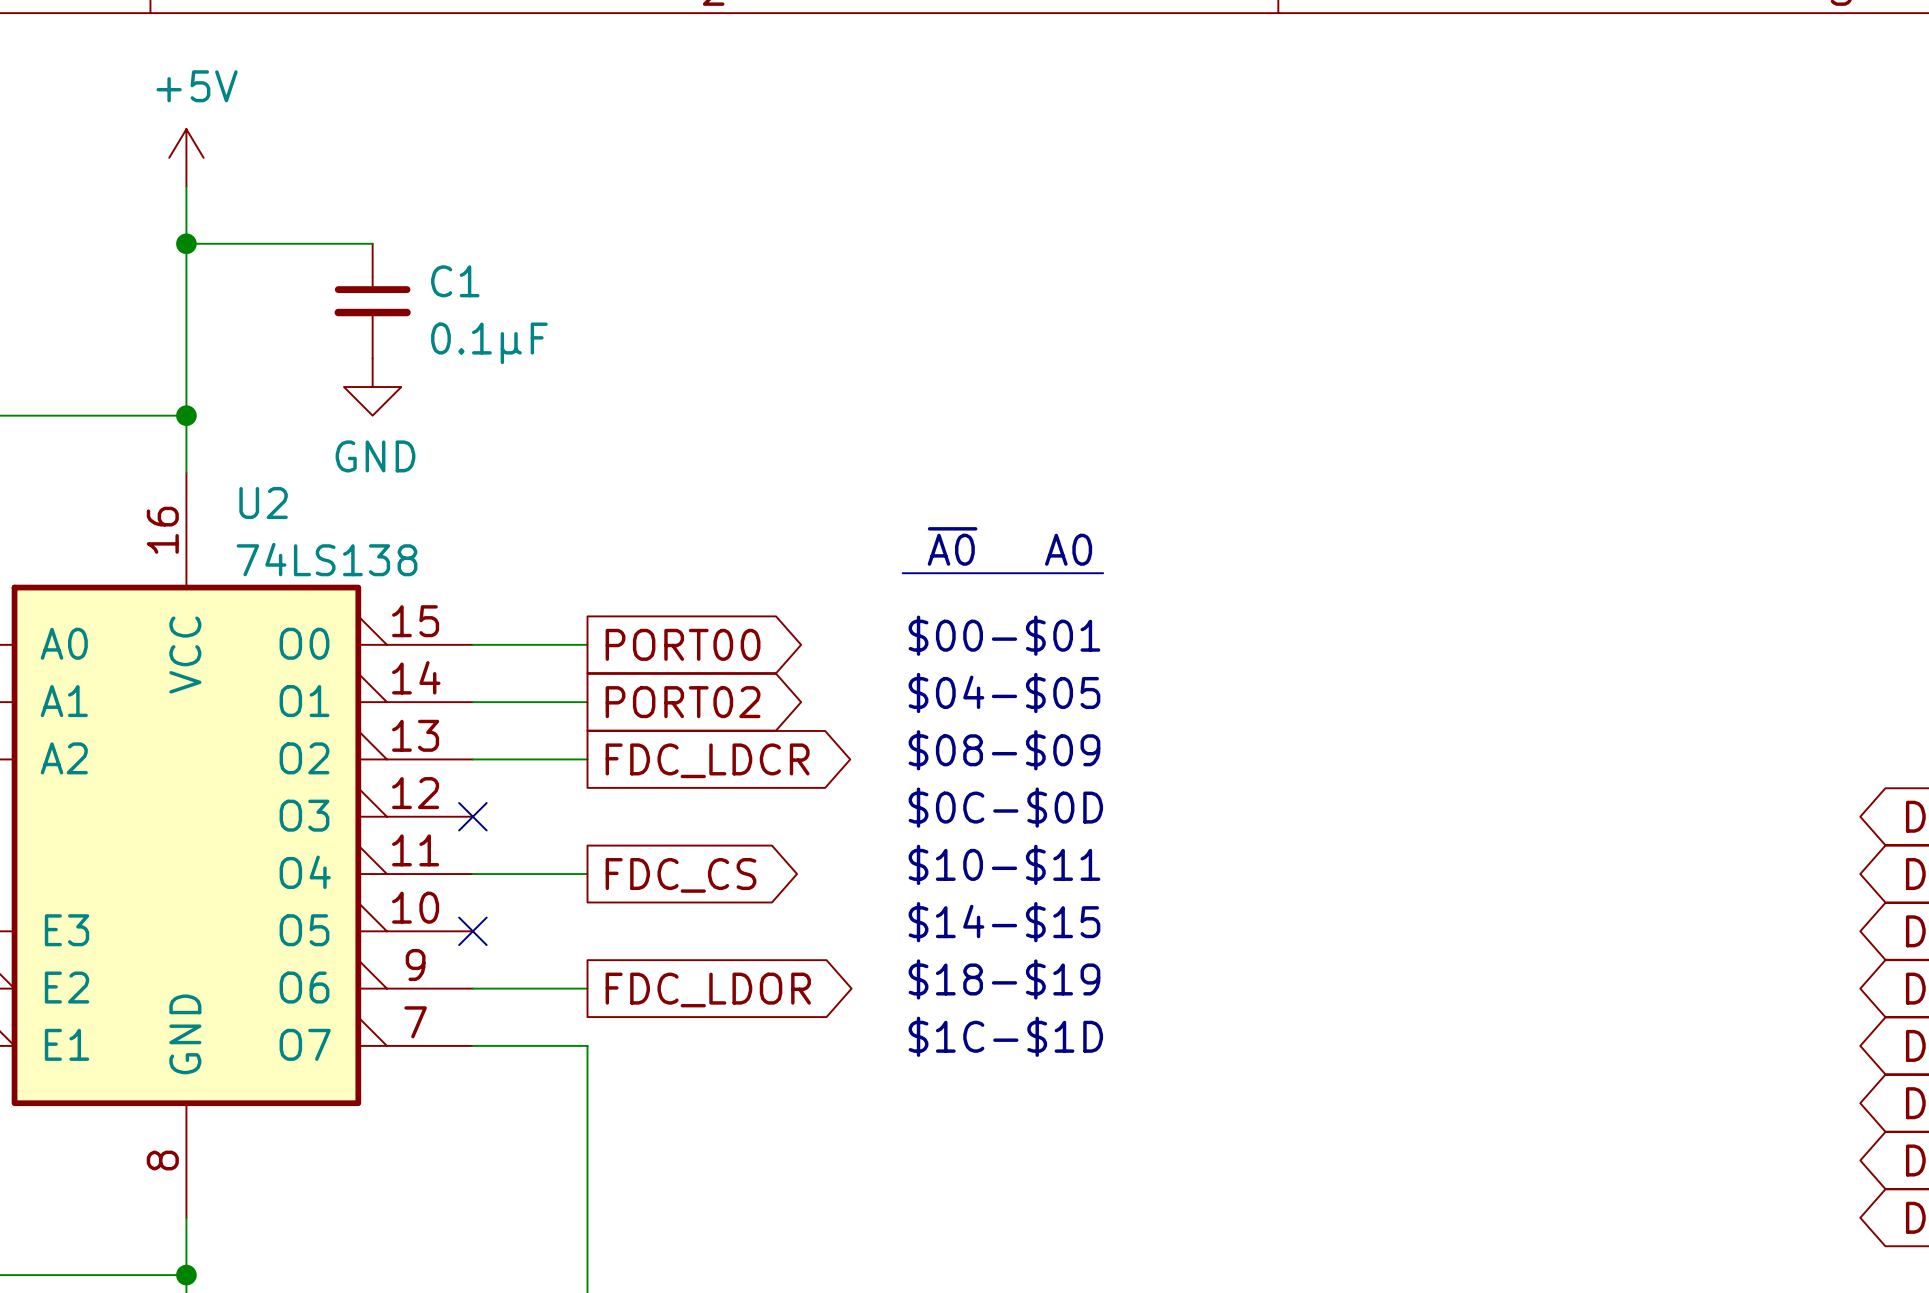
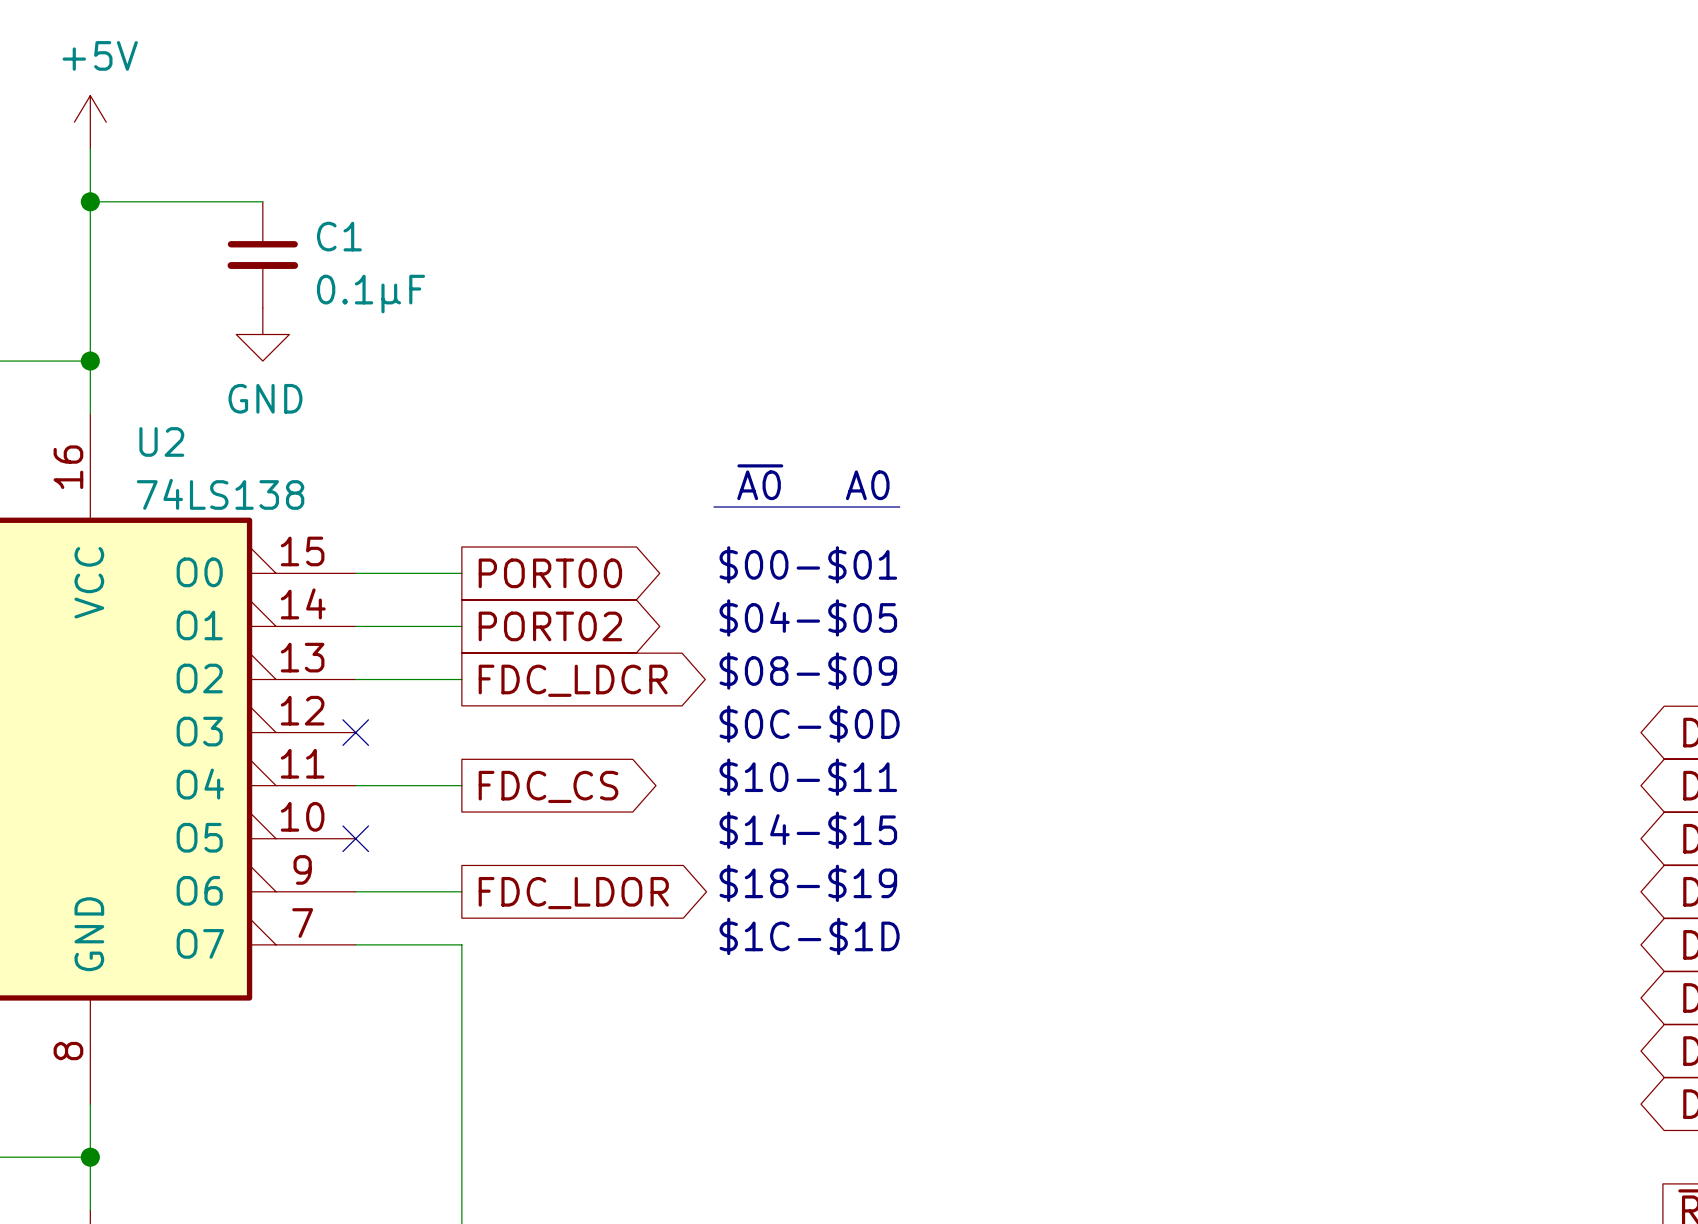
text position: ~{A0} A0 (1009, 546) -> ~{A0} A0 (813, 482)
line: (1060, 573) (1103, 573) -> (713, 507) (753, 507)
text position: $00-$01 (1004, 635) -> $00-$01 (808, 564)
text position: $04-$05 (1004, 692) -> $04-$05 (808, 617)
text position: $08-$09 (1004, 750) -> $08-$09 (808, 671)
text position: $0C-$0D (1005, 807) -> $0C-$0D (809, 724)
text position: $10-$11 (1004, 864) -> $10-$11 (808, 777)
text position: $14-$15 (1004, 922) -> $14-$15 (808, 830)
text position: $18-$19 (1004, 979) -> $18-$19 (808, 883)
text position: $1C-$1D (1005, 1036) -> $1C-$1D (809, 936)

